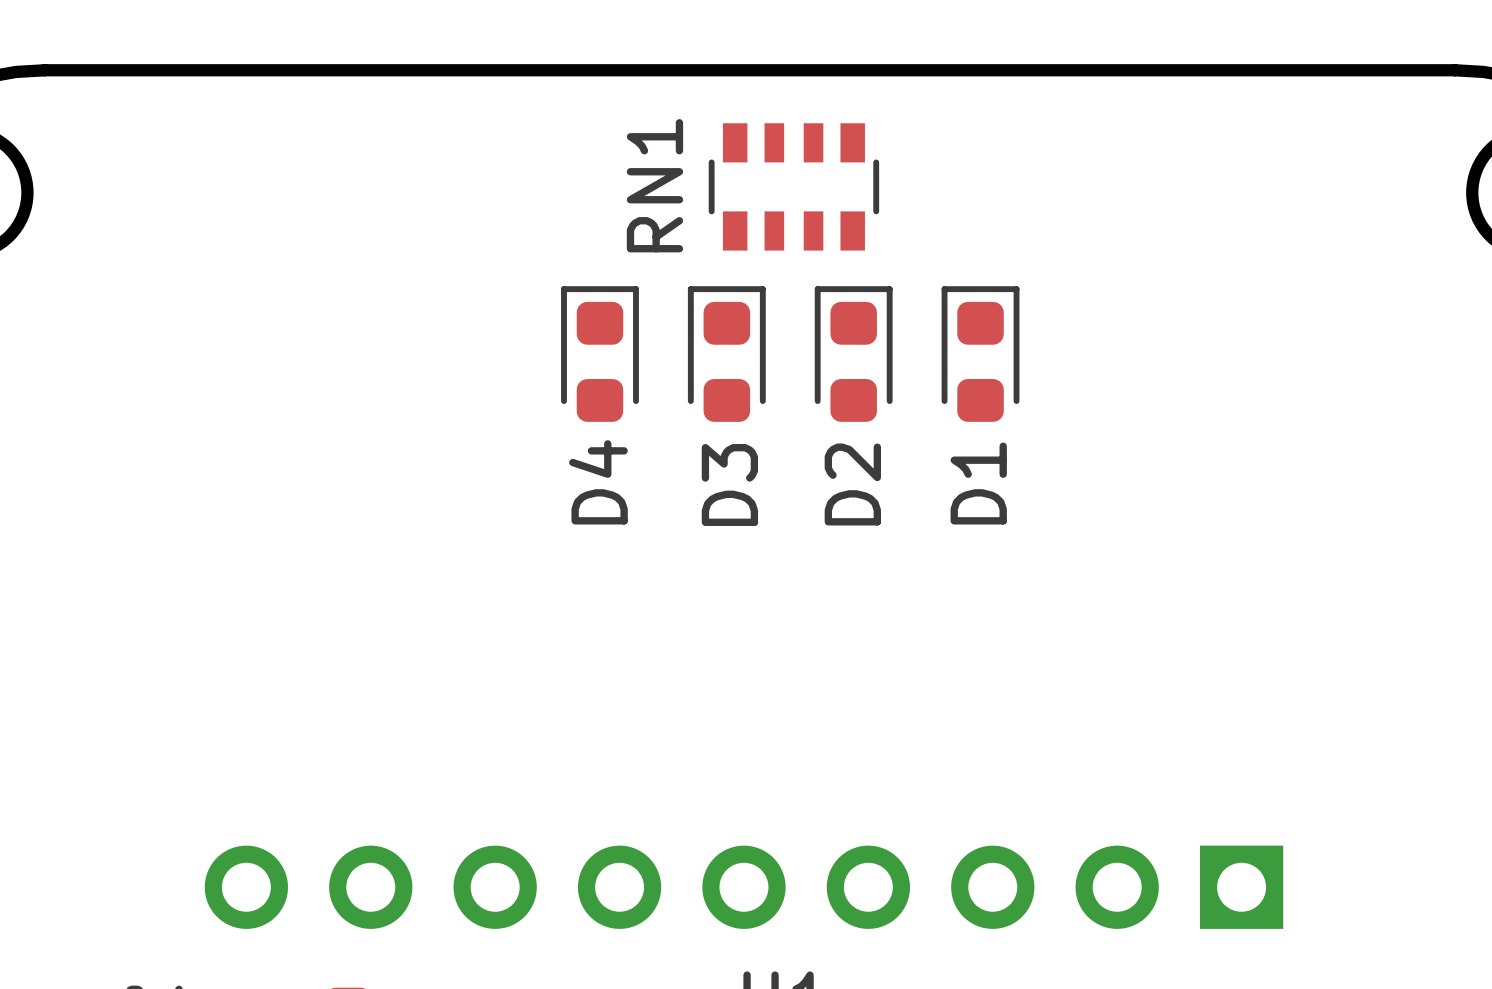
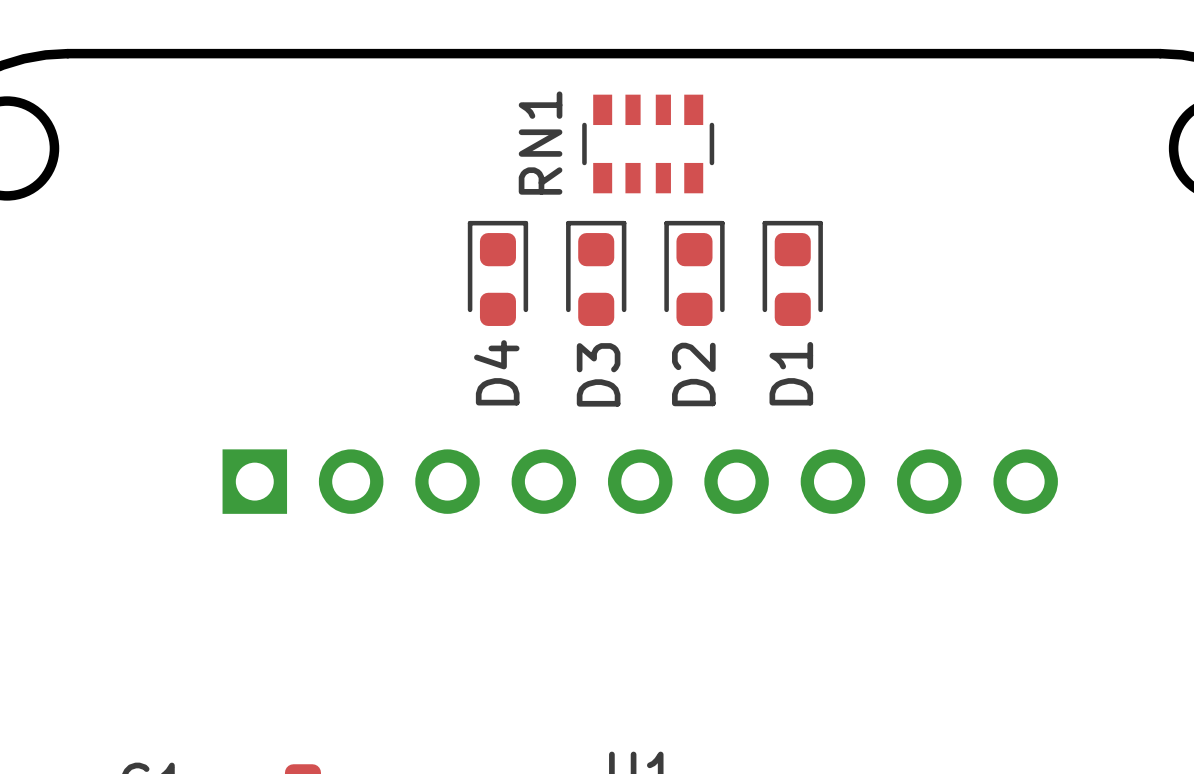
part rotation: 0° (743, 887) -> 180° (640, 481)

